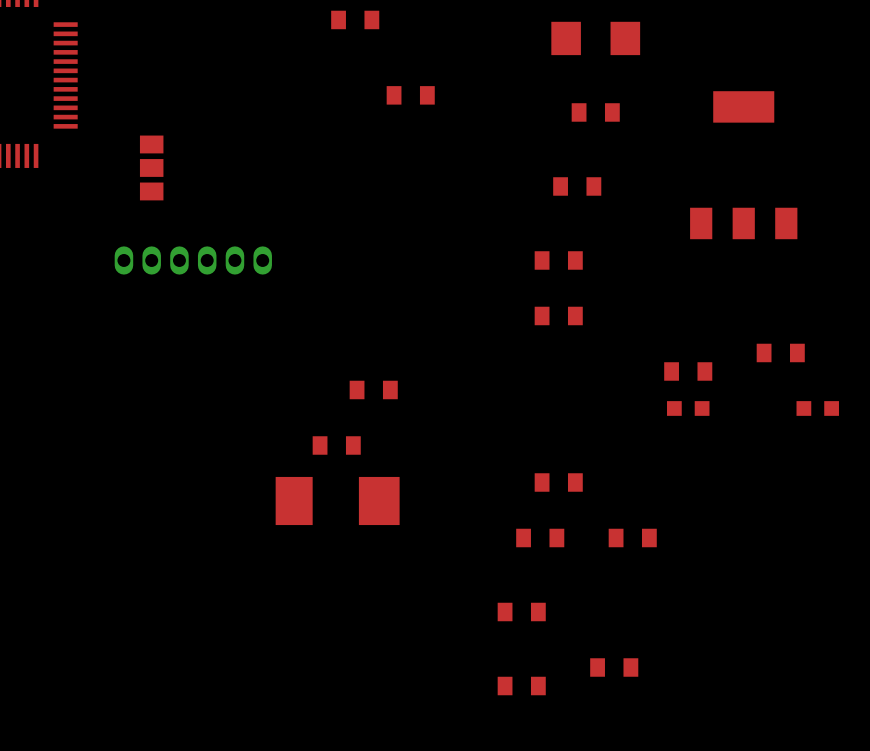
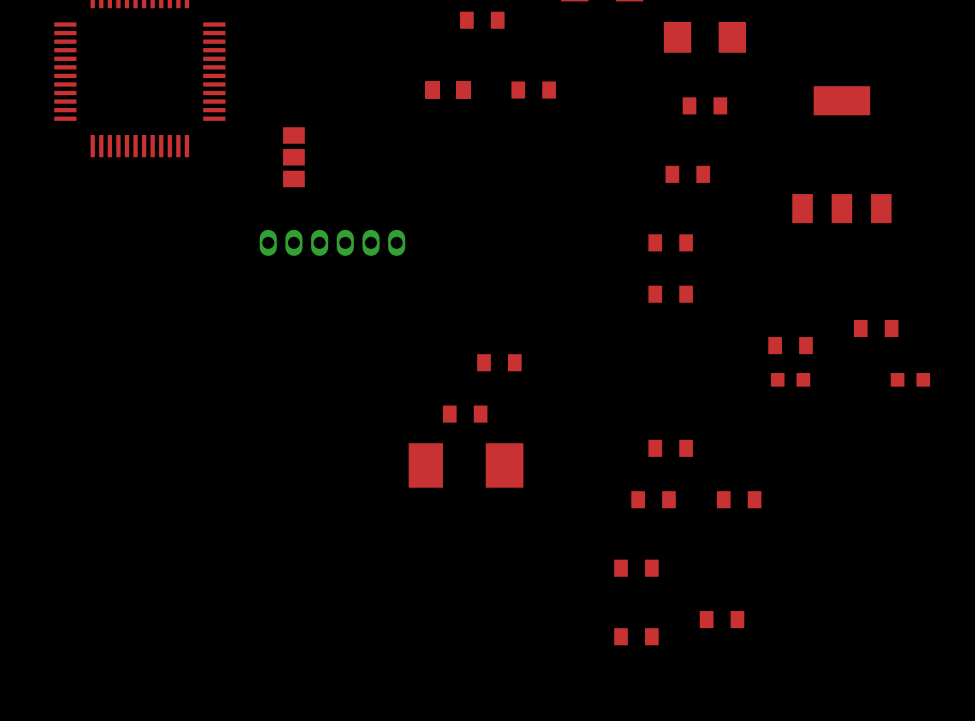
part: none -> (448, 90)

